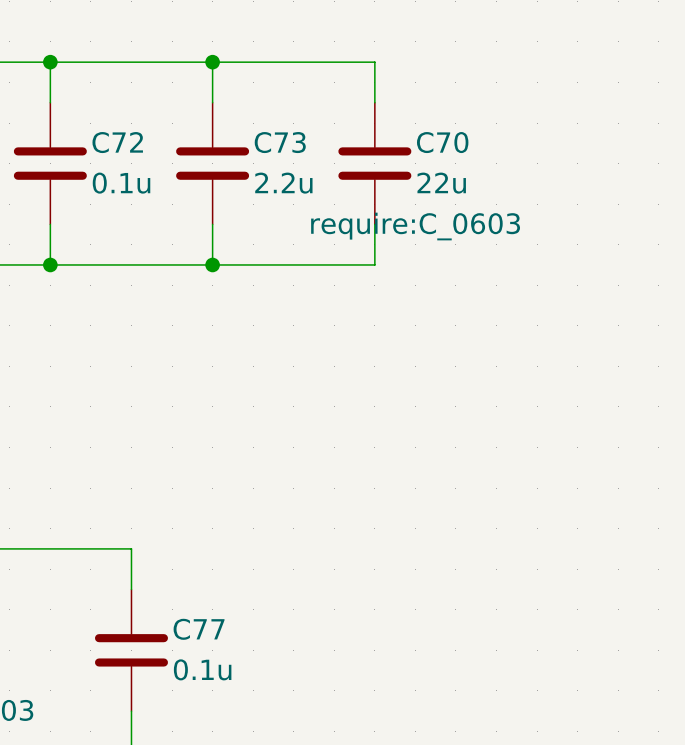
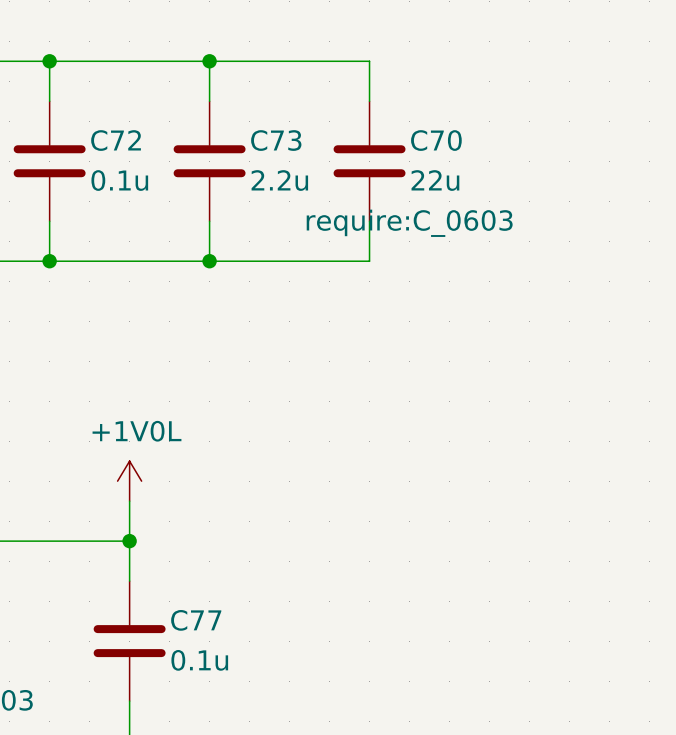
power symbol: none -> +1V0L (129, 481)
wire: none -> (129, 501) (129, 541)
junction: none -> (129, 541)

